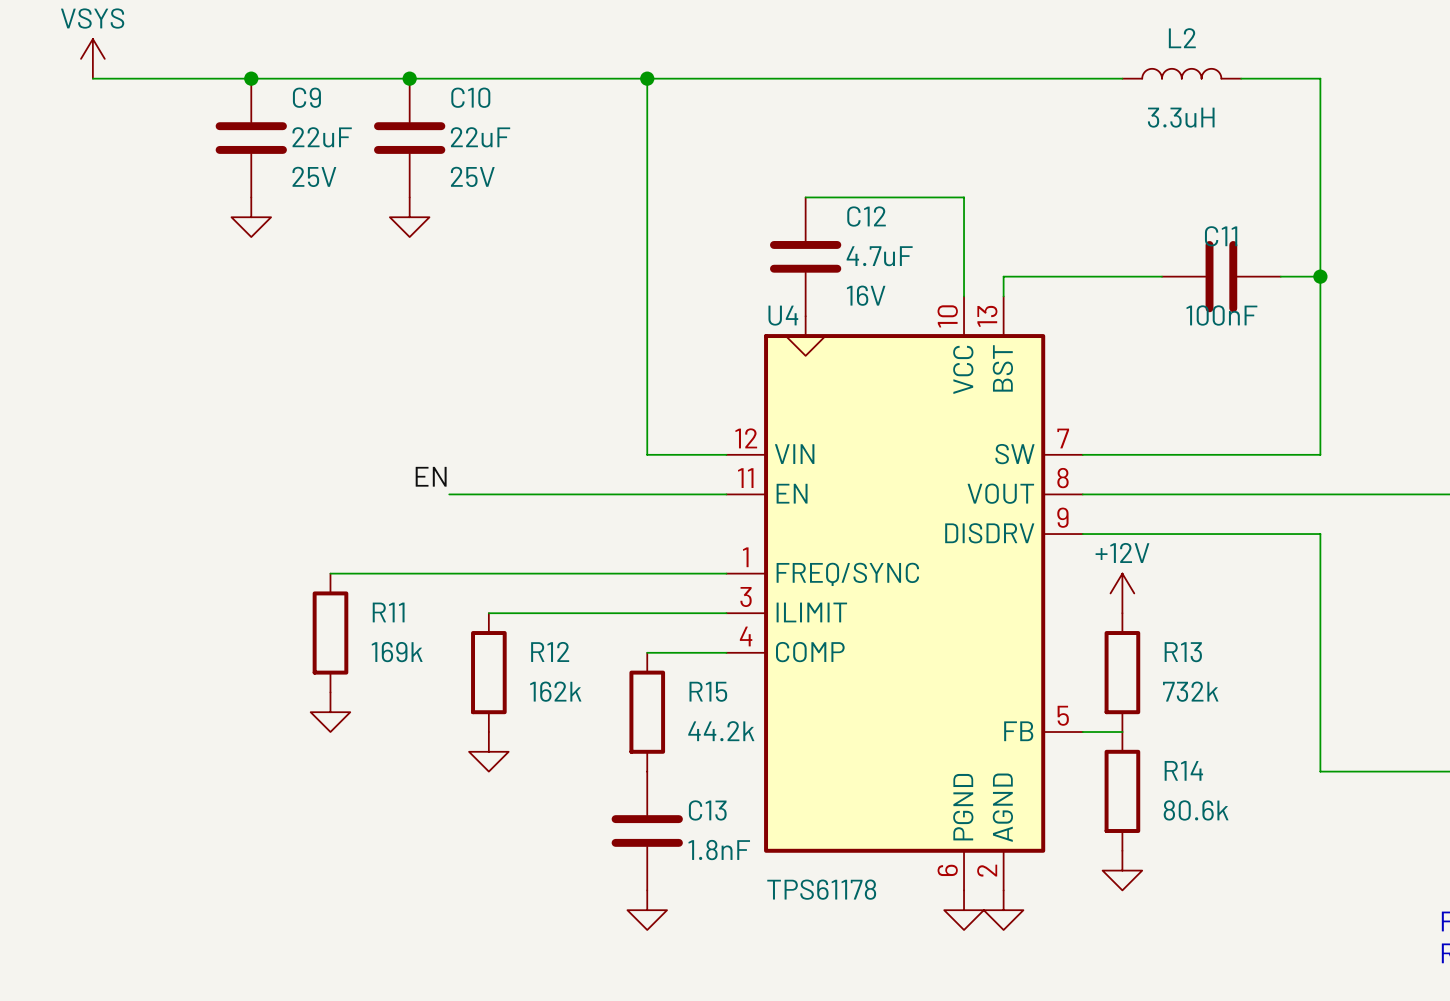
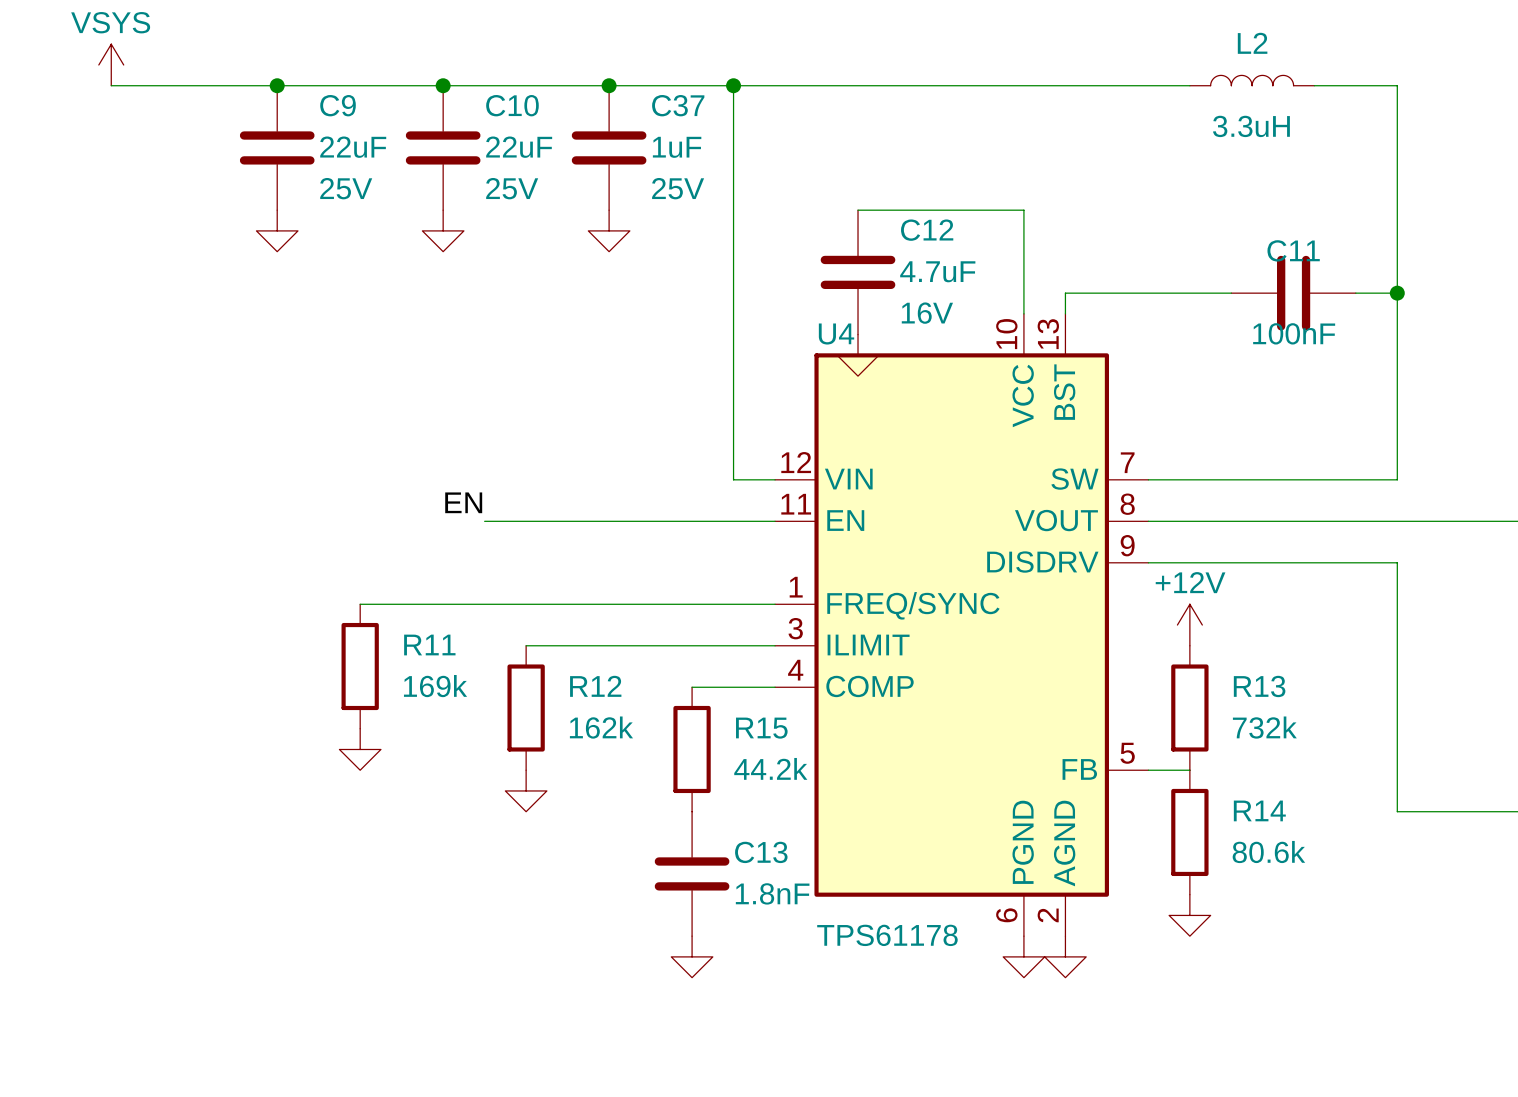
junction: none -> (609, 85)
wire: (647, 78) (647, 454) (686, 454) -> (733, 85) (733, 479)
junction: (647, 78) -> none
junction: none -> (733, 85)
C37: none -> 1uF (609, 147)
power symbol: none -> (609, 230)

